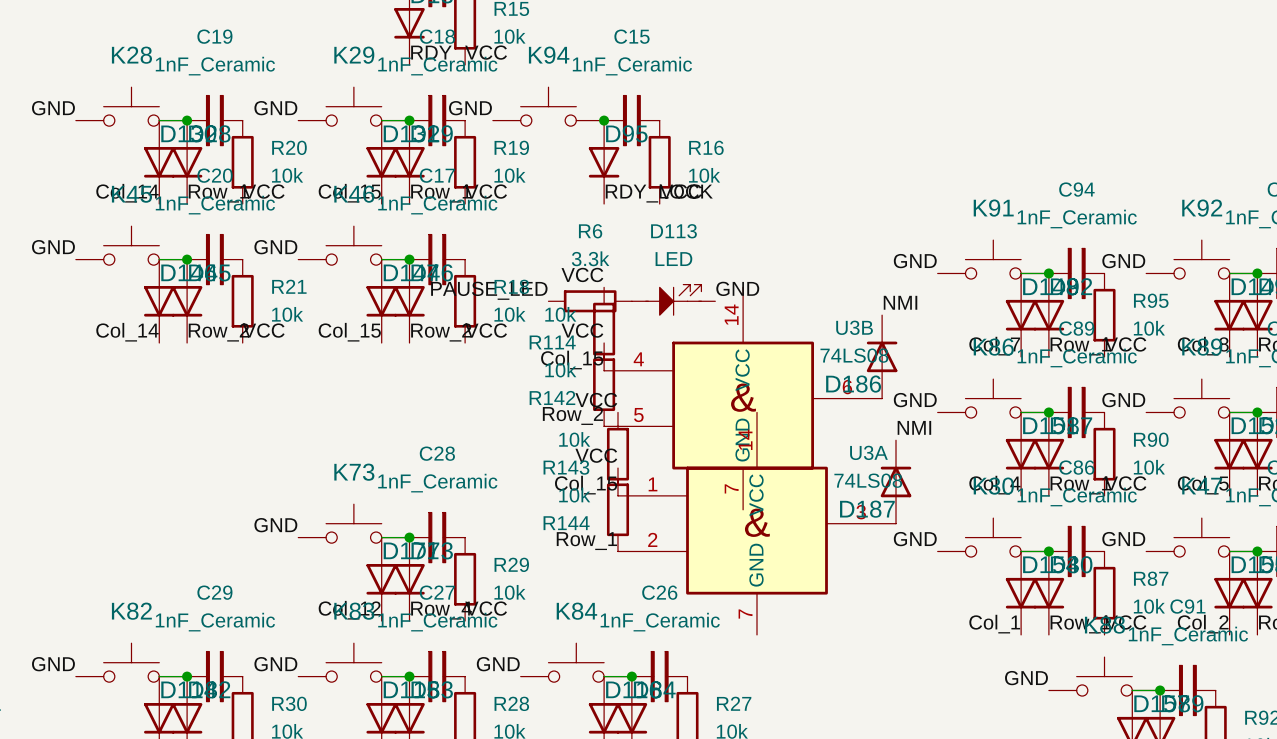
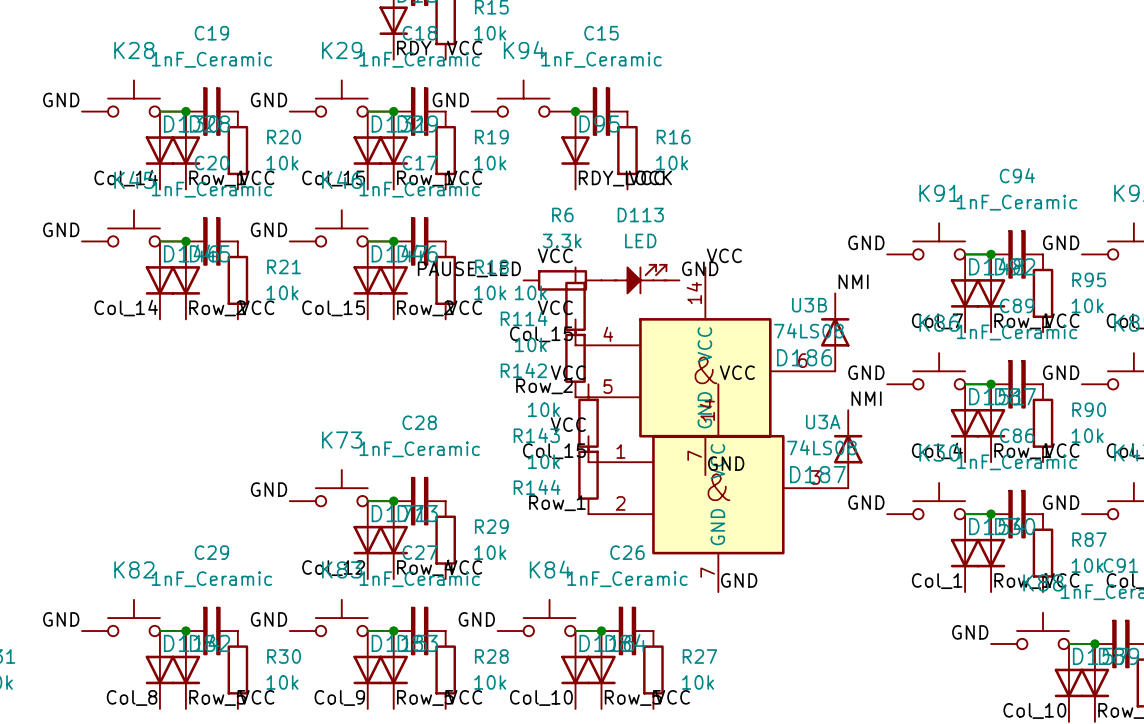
label: none -> VCC (724, 255)
label: none -> VCC (737, 372)
label: none -> GND (726, 463)
label: none -> GND (739, 580)

